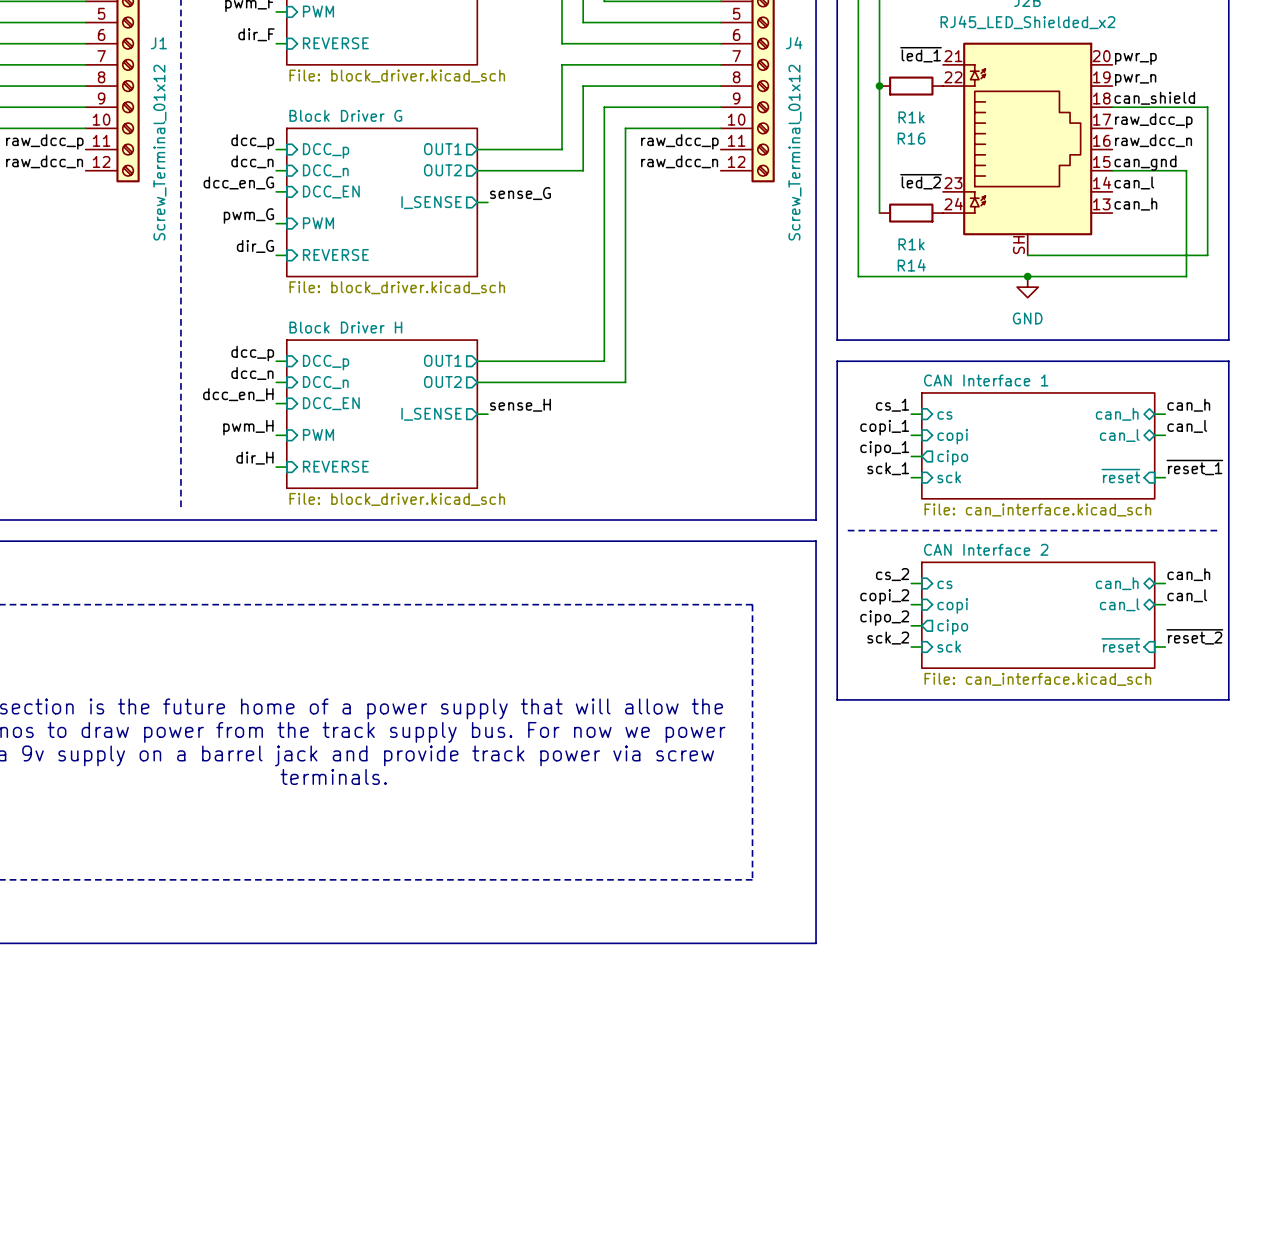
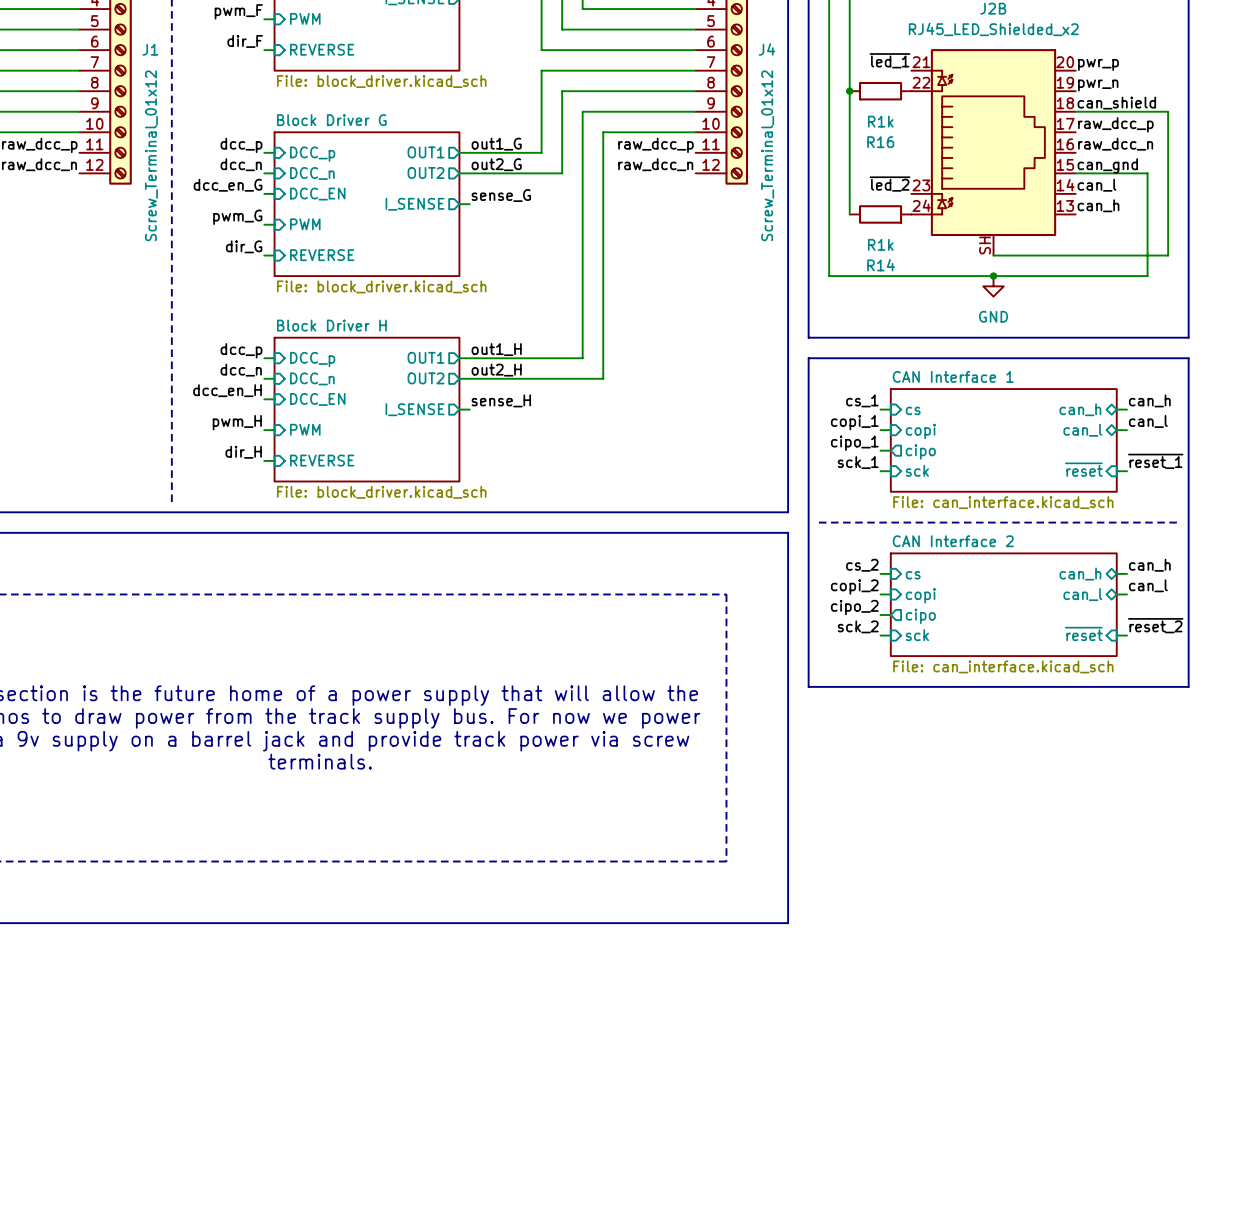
label: none -> out1_G (496, 144)
label: none -> out2_G (496, 164)
label: none -> out1_H (496, 349)
label: none -> out2_H (496, 370)

